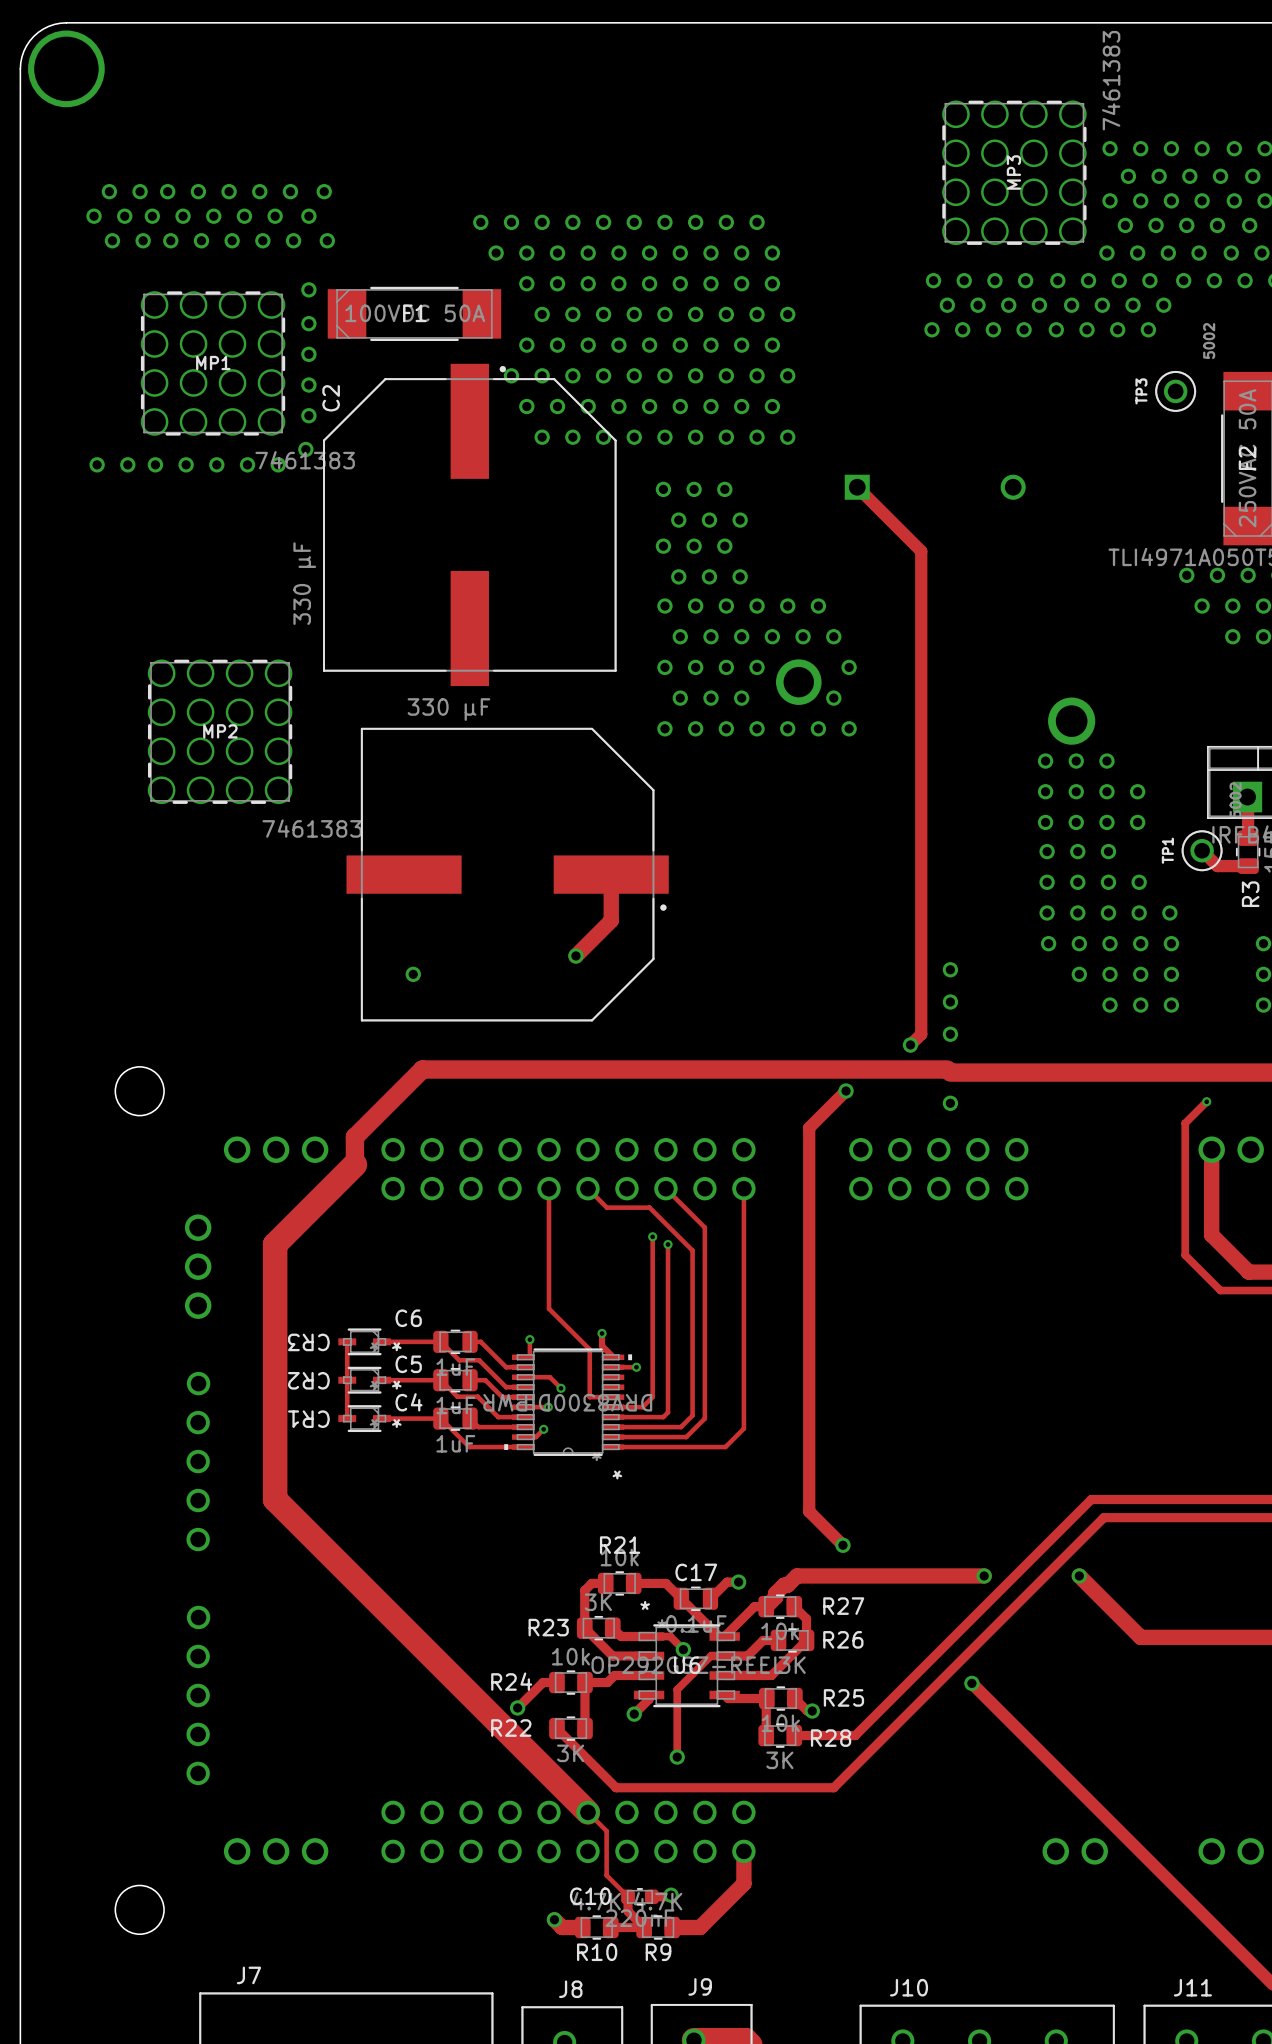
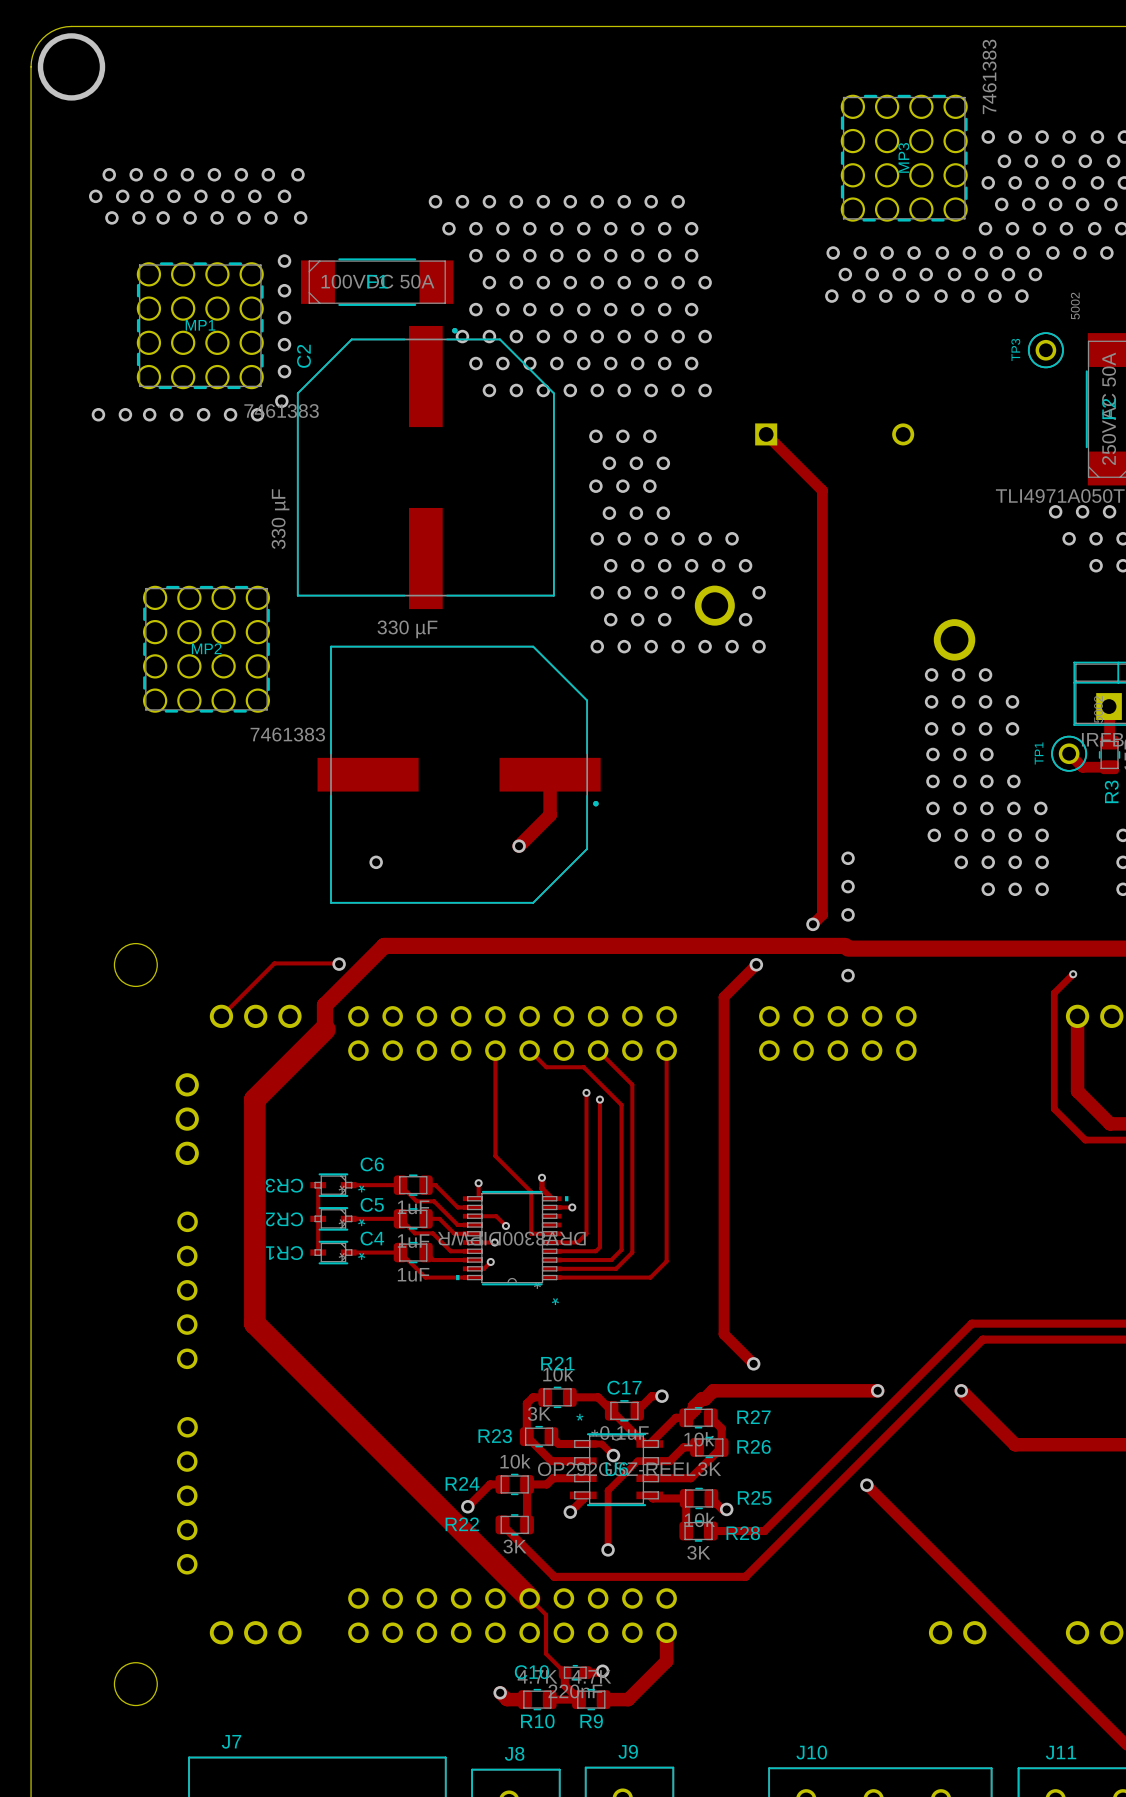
track: none -> (339, 964) (274, 963) (221, 1016)
via: none -> (339, 964)

